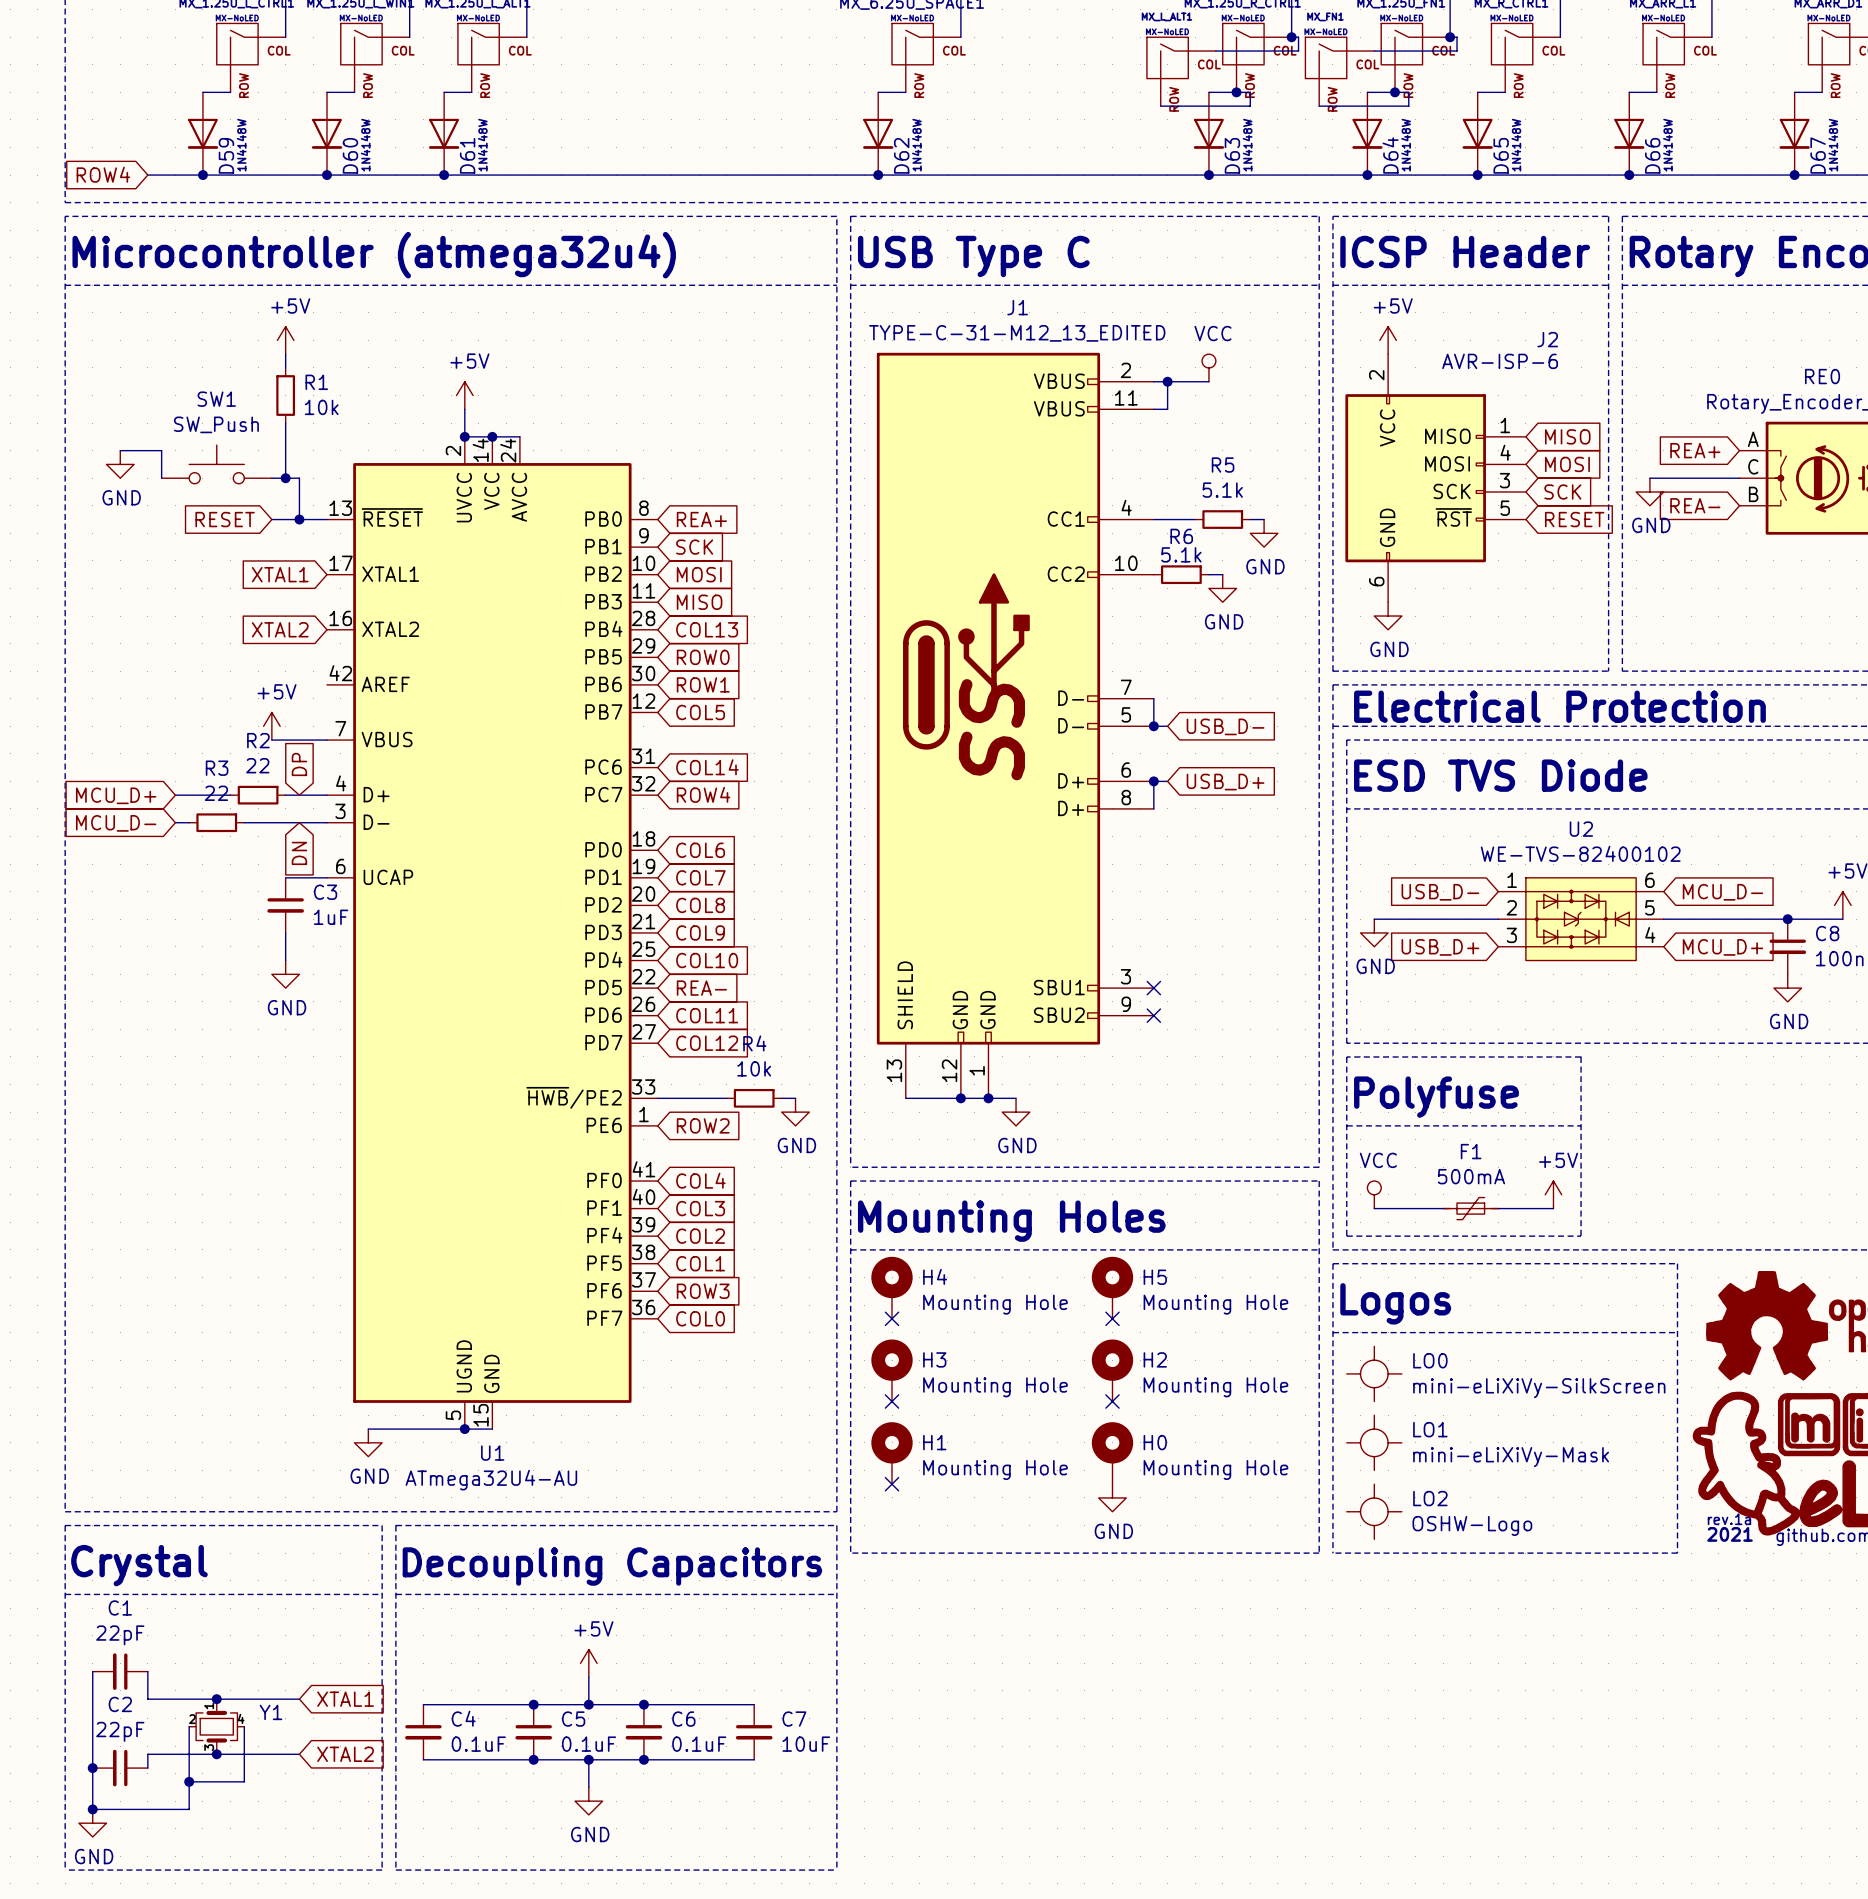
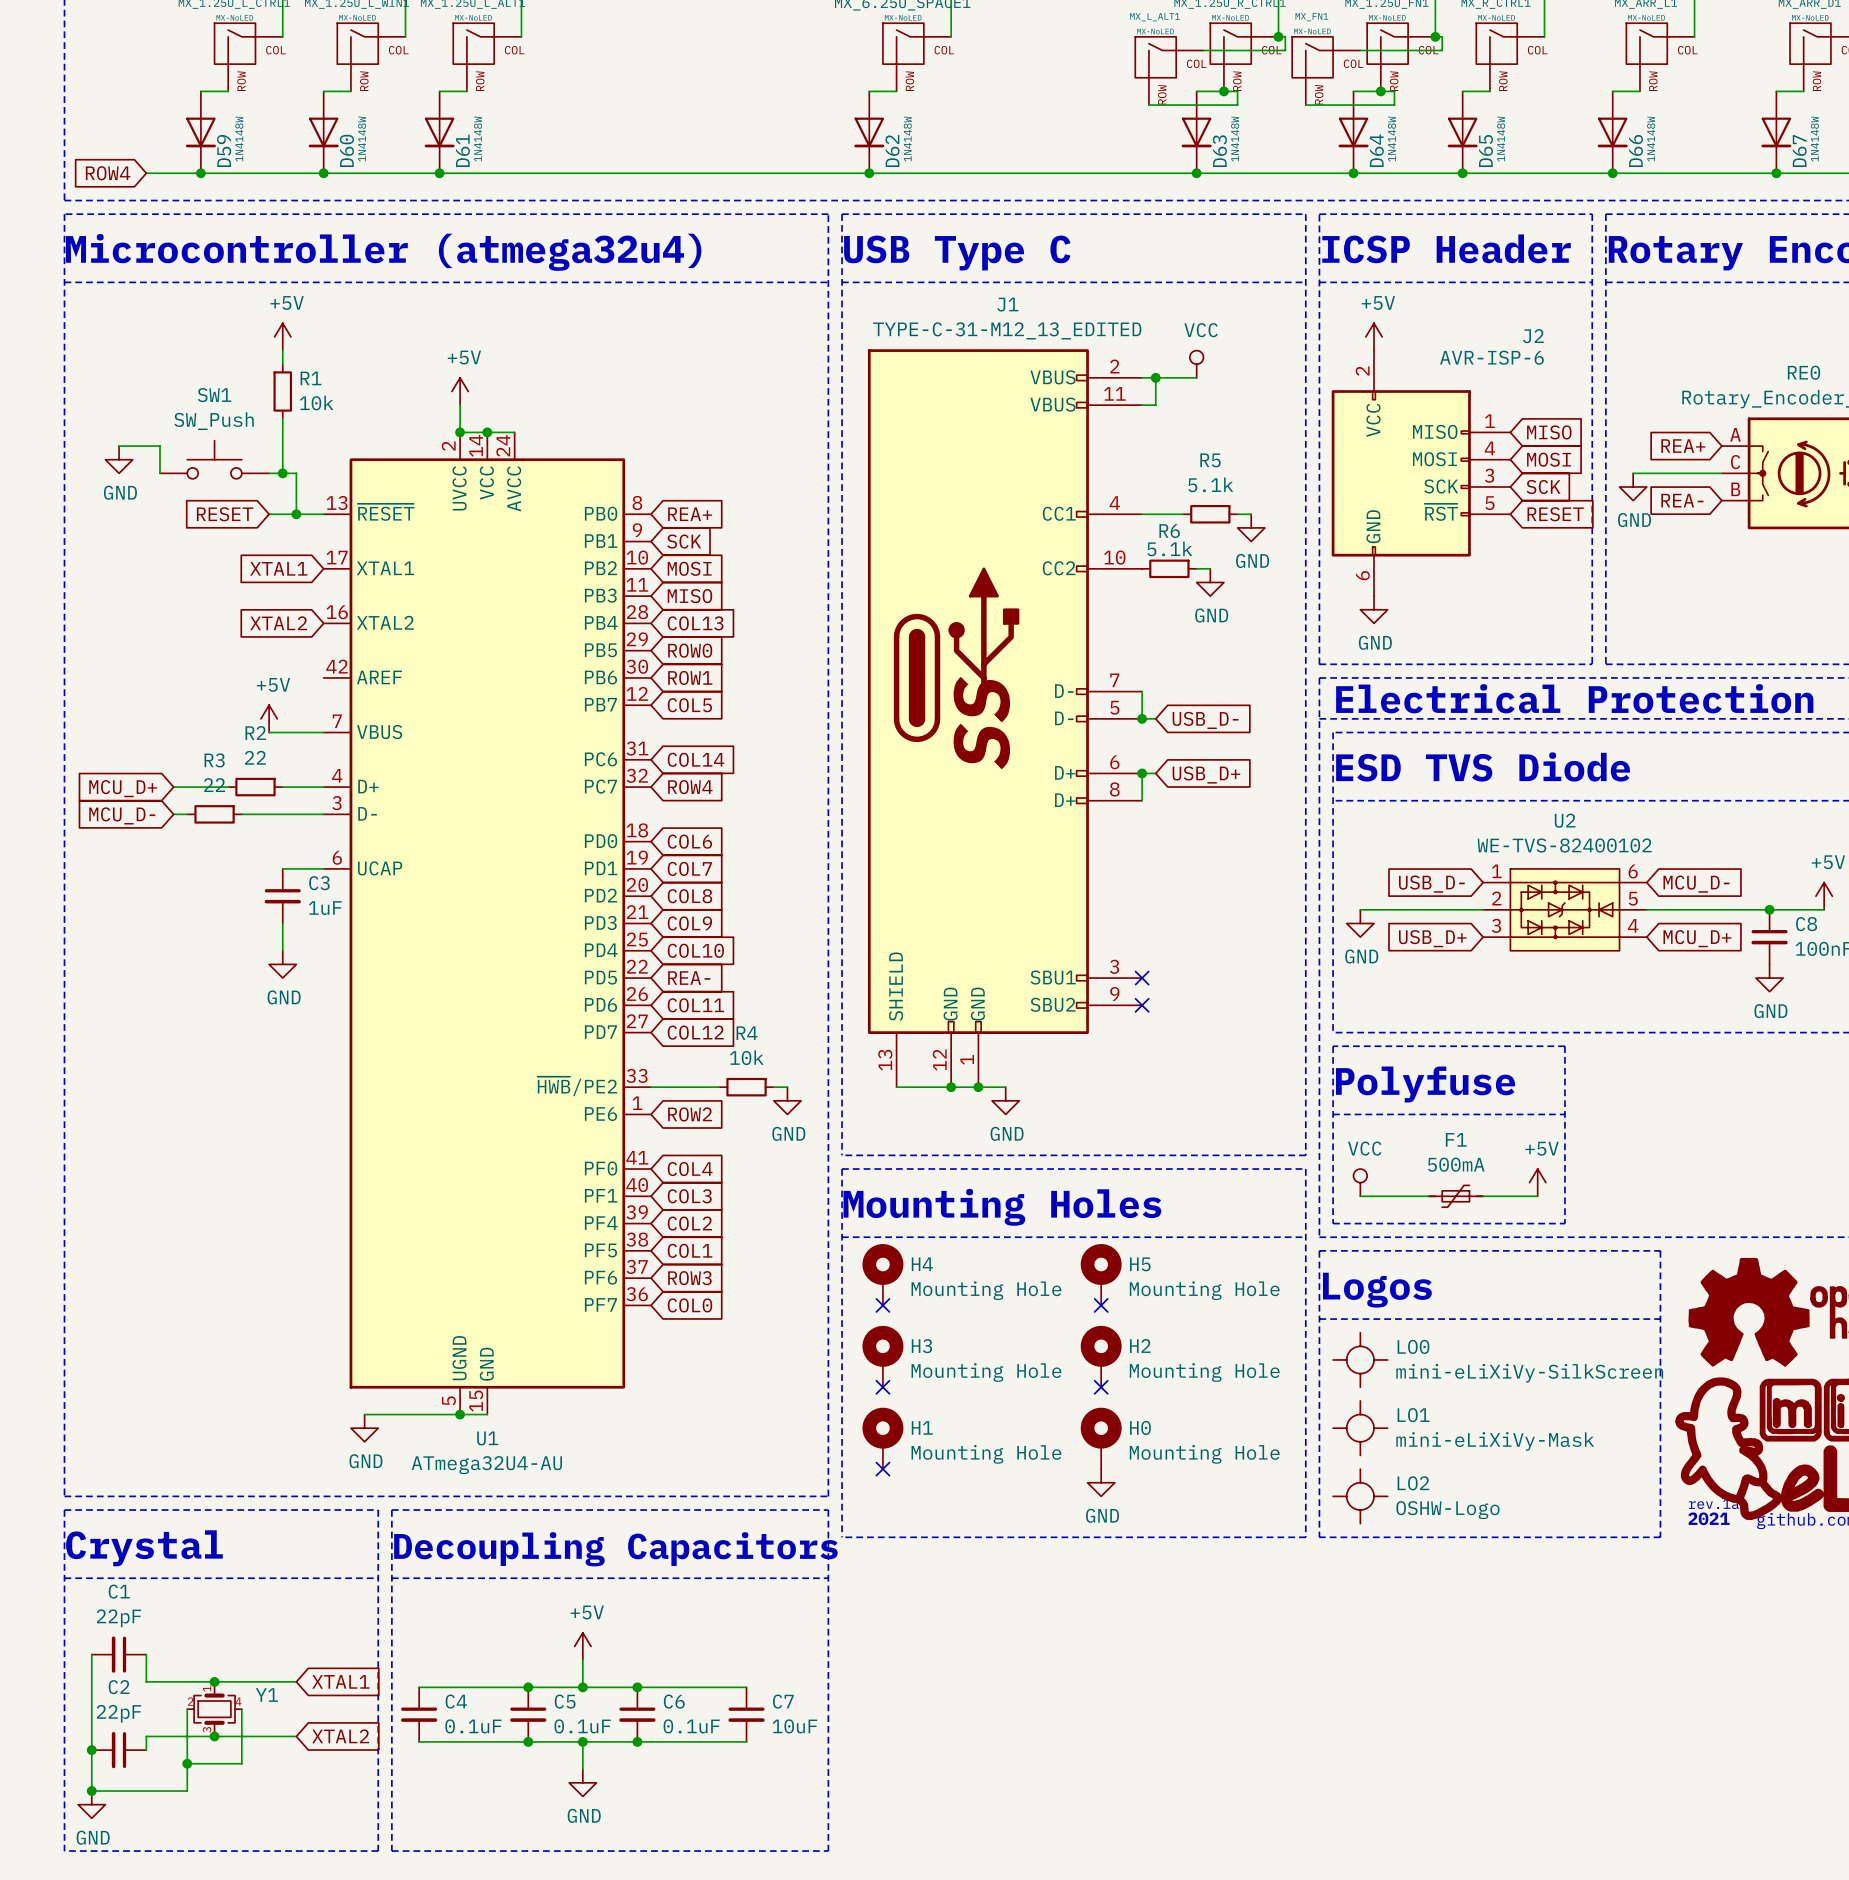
global label: DP (299, 764) -> none
global label: DN (299, 853) -> none

